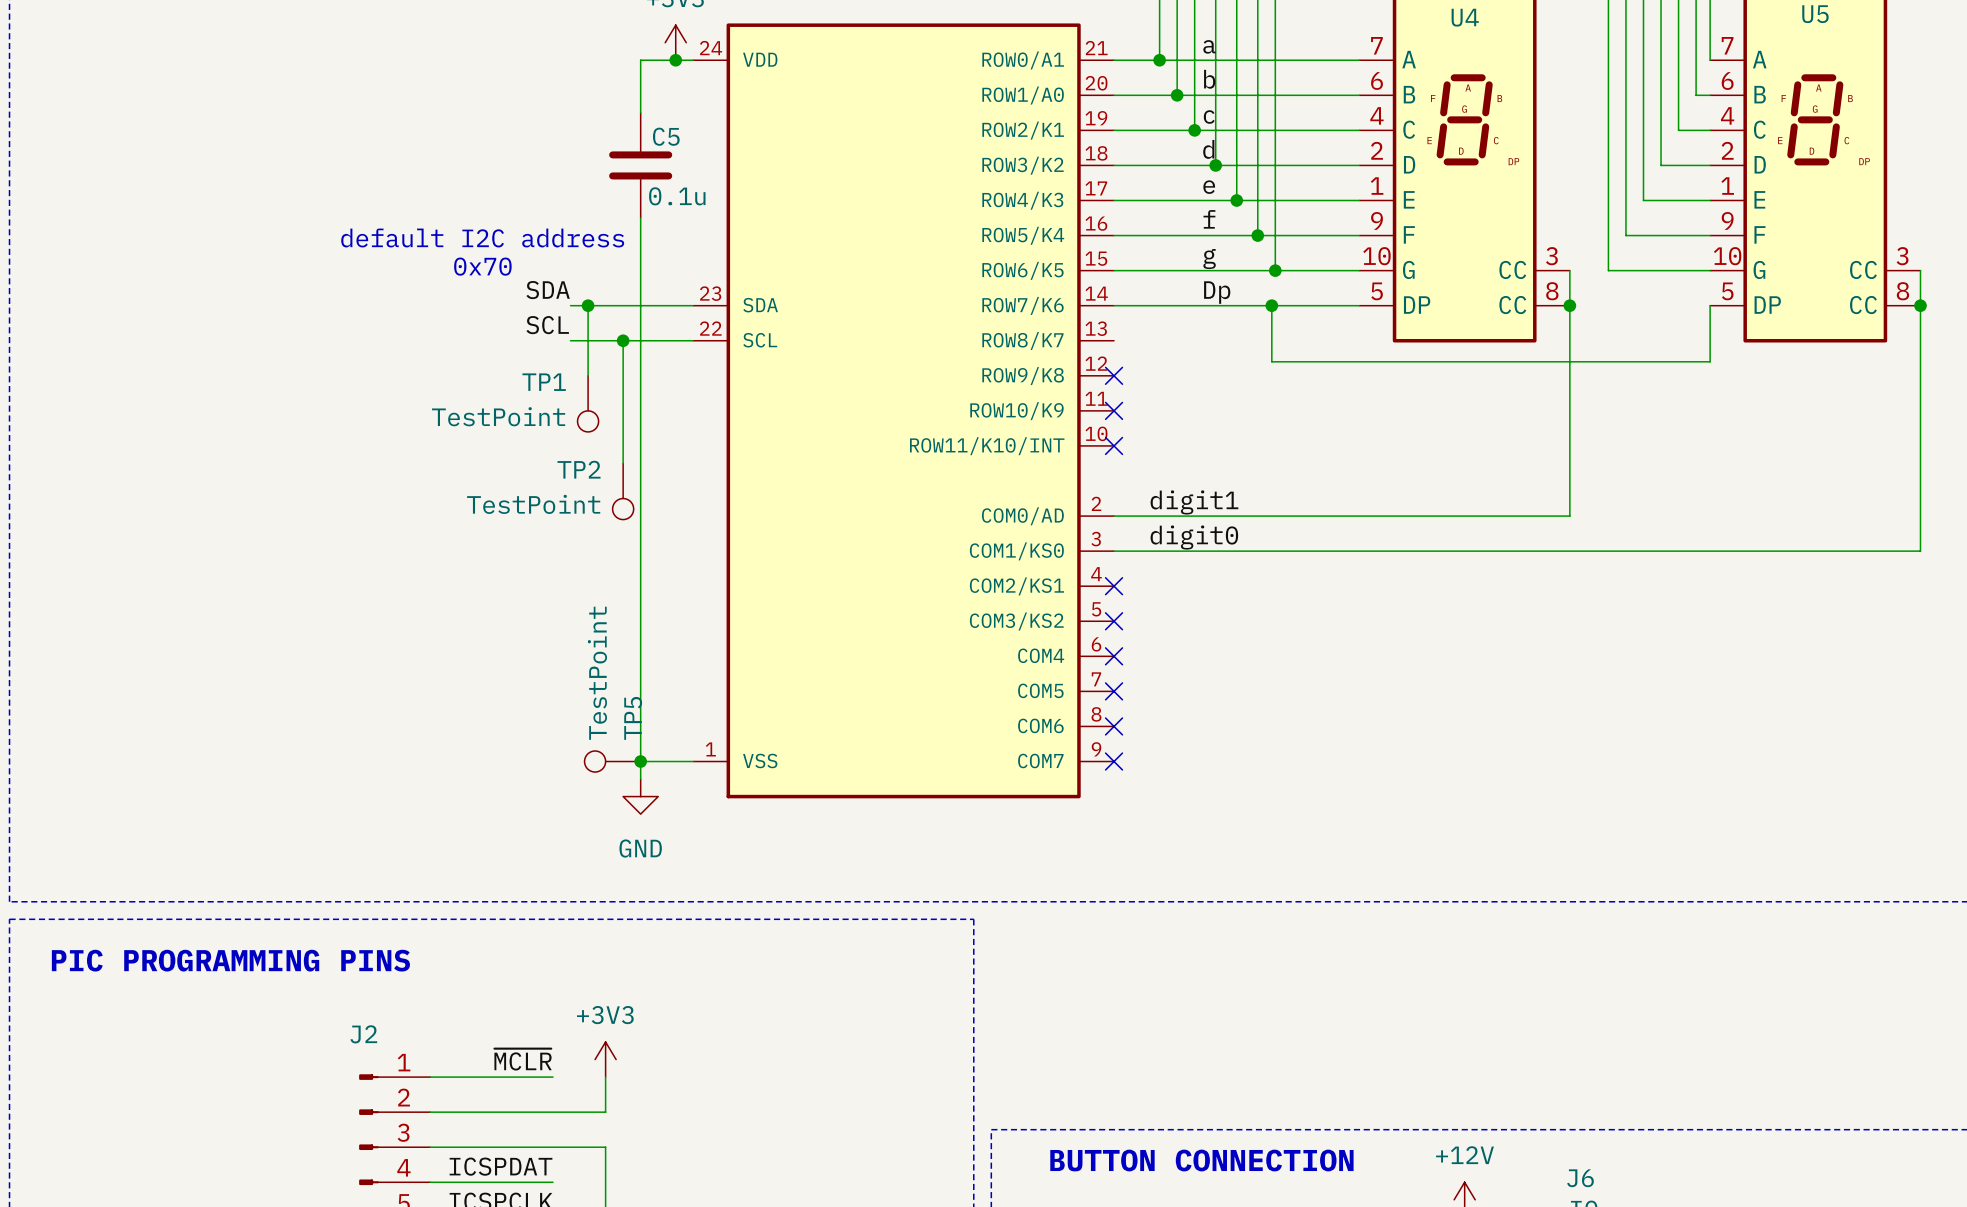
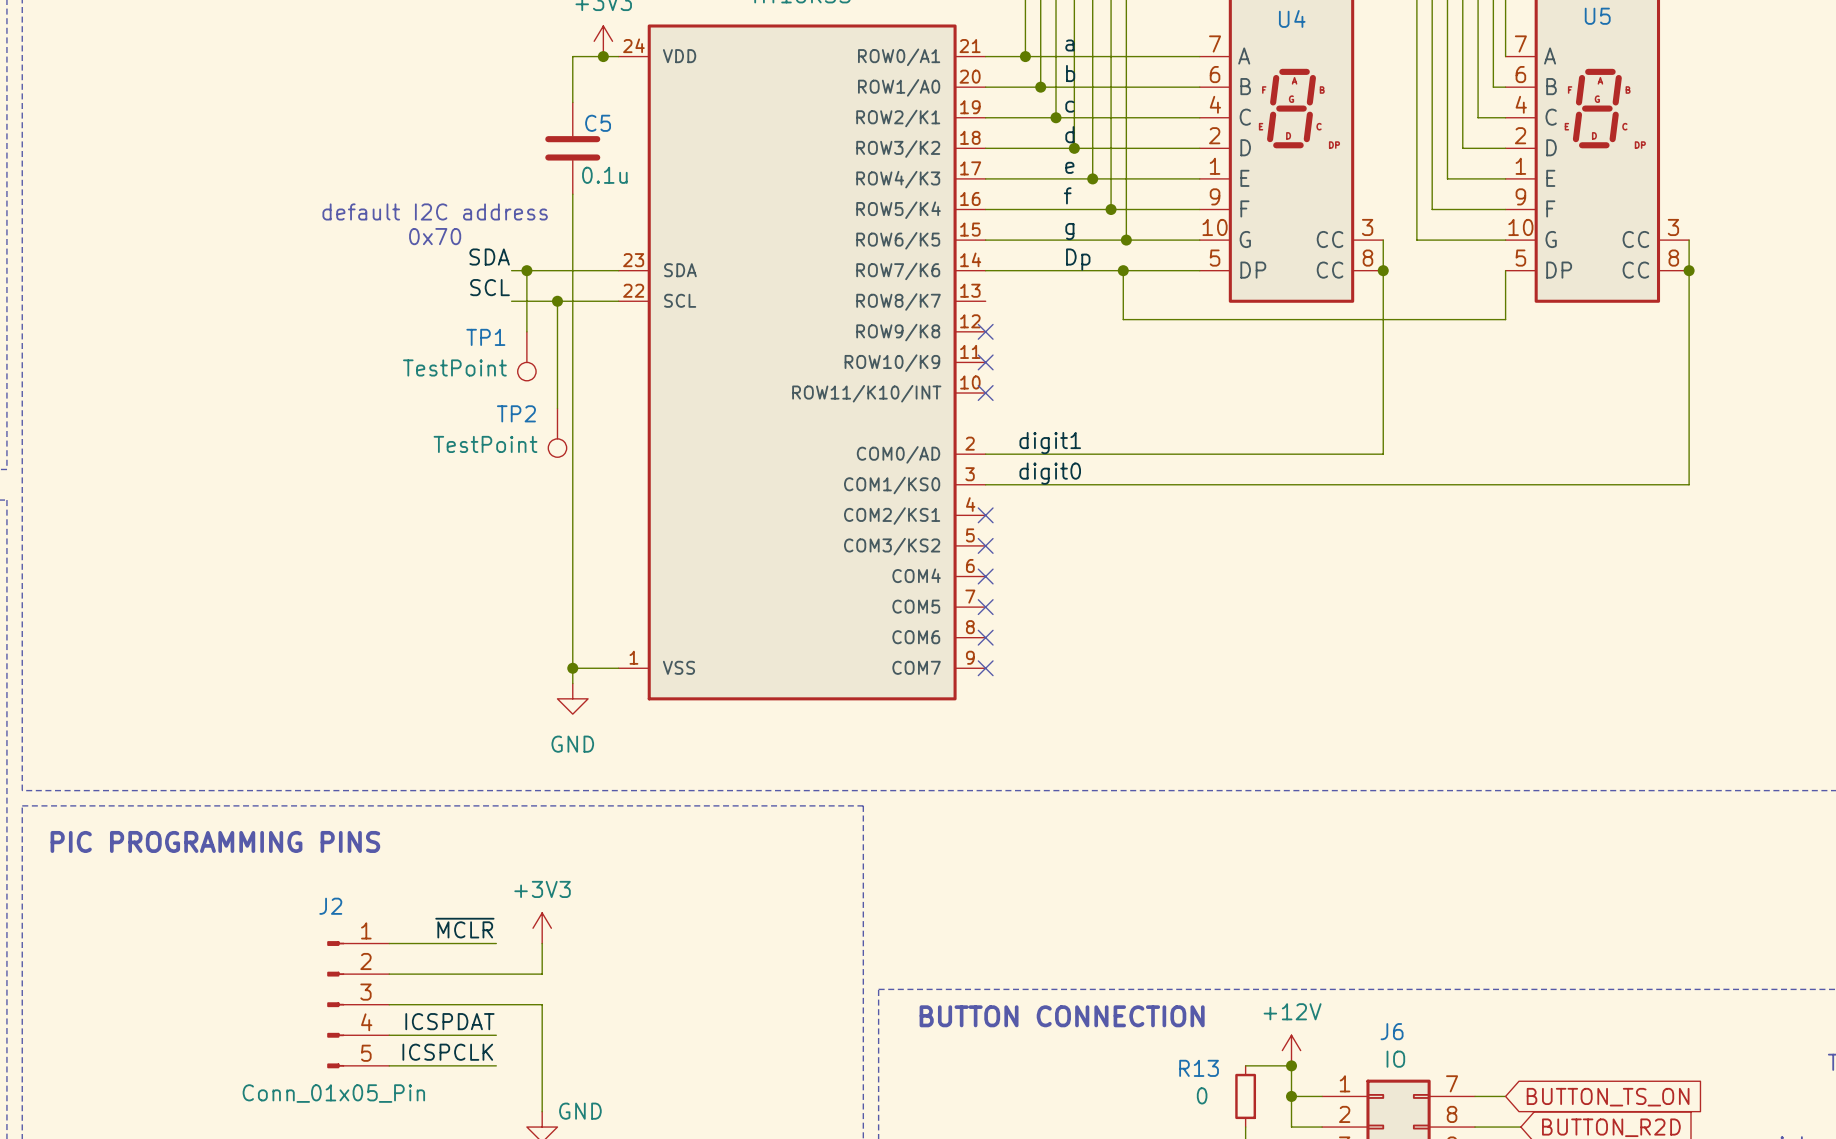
TP5: TestPoint (612, 761) -> none

